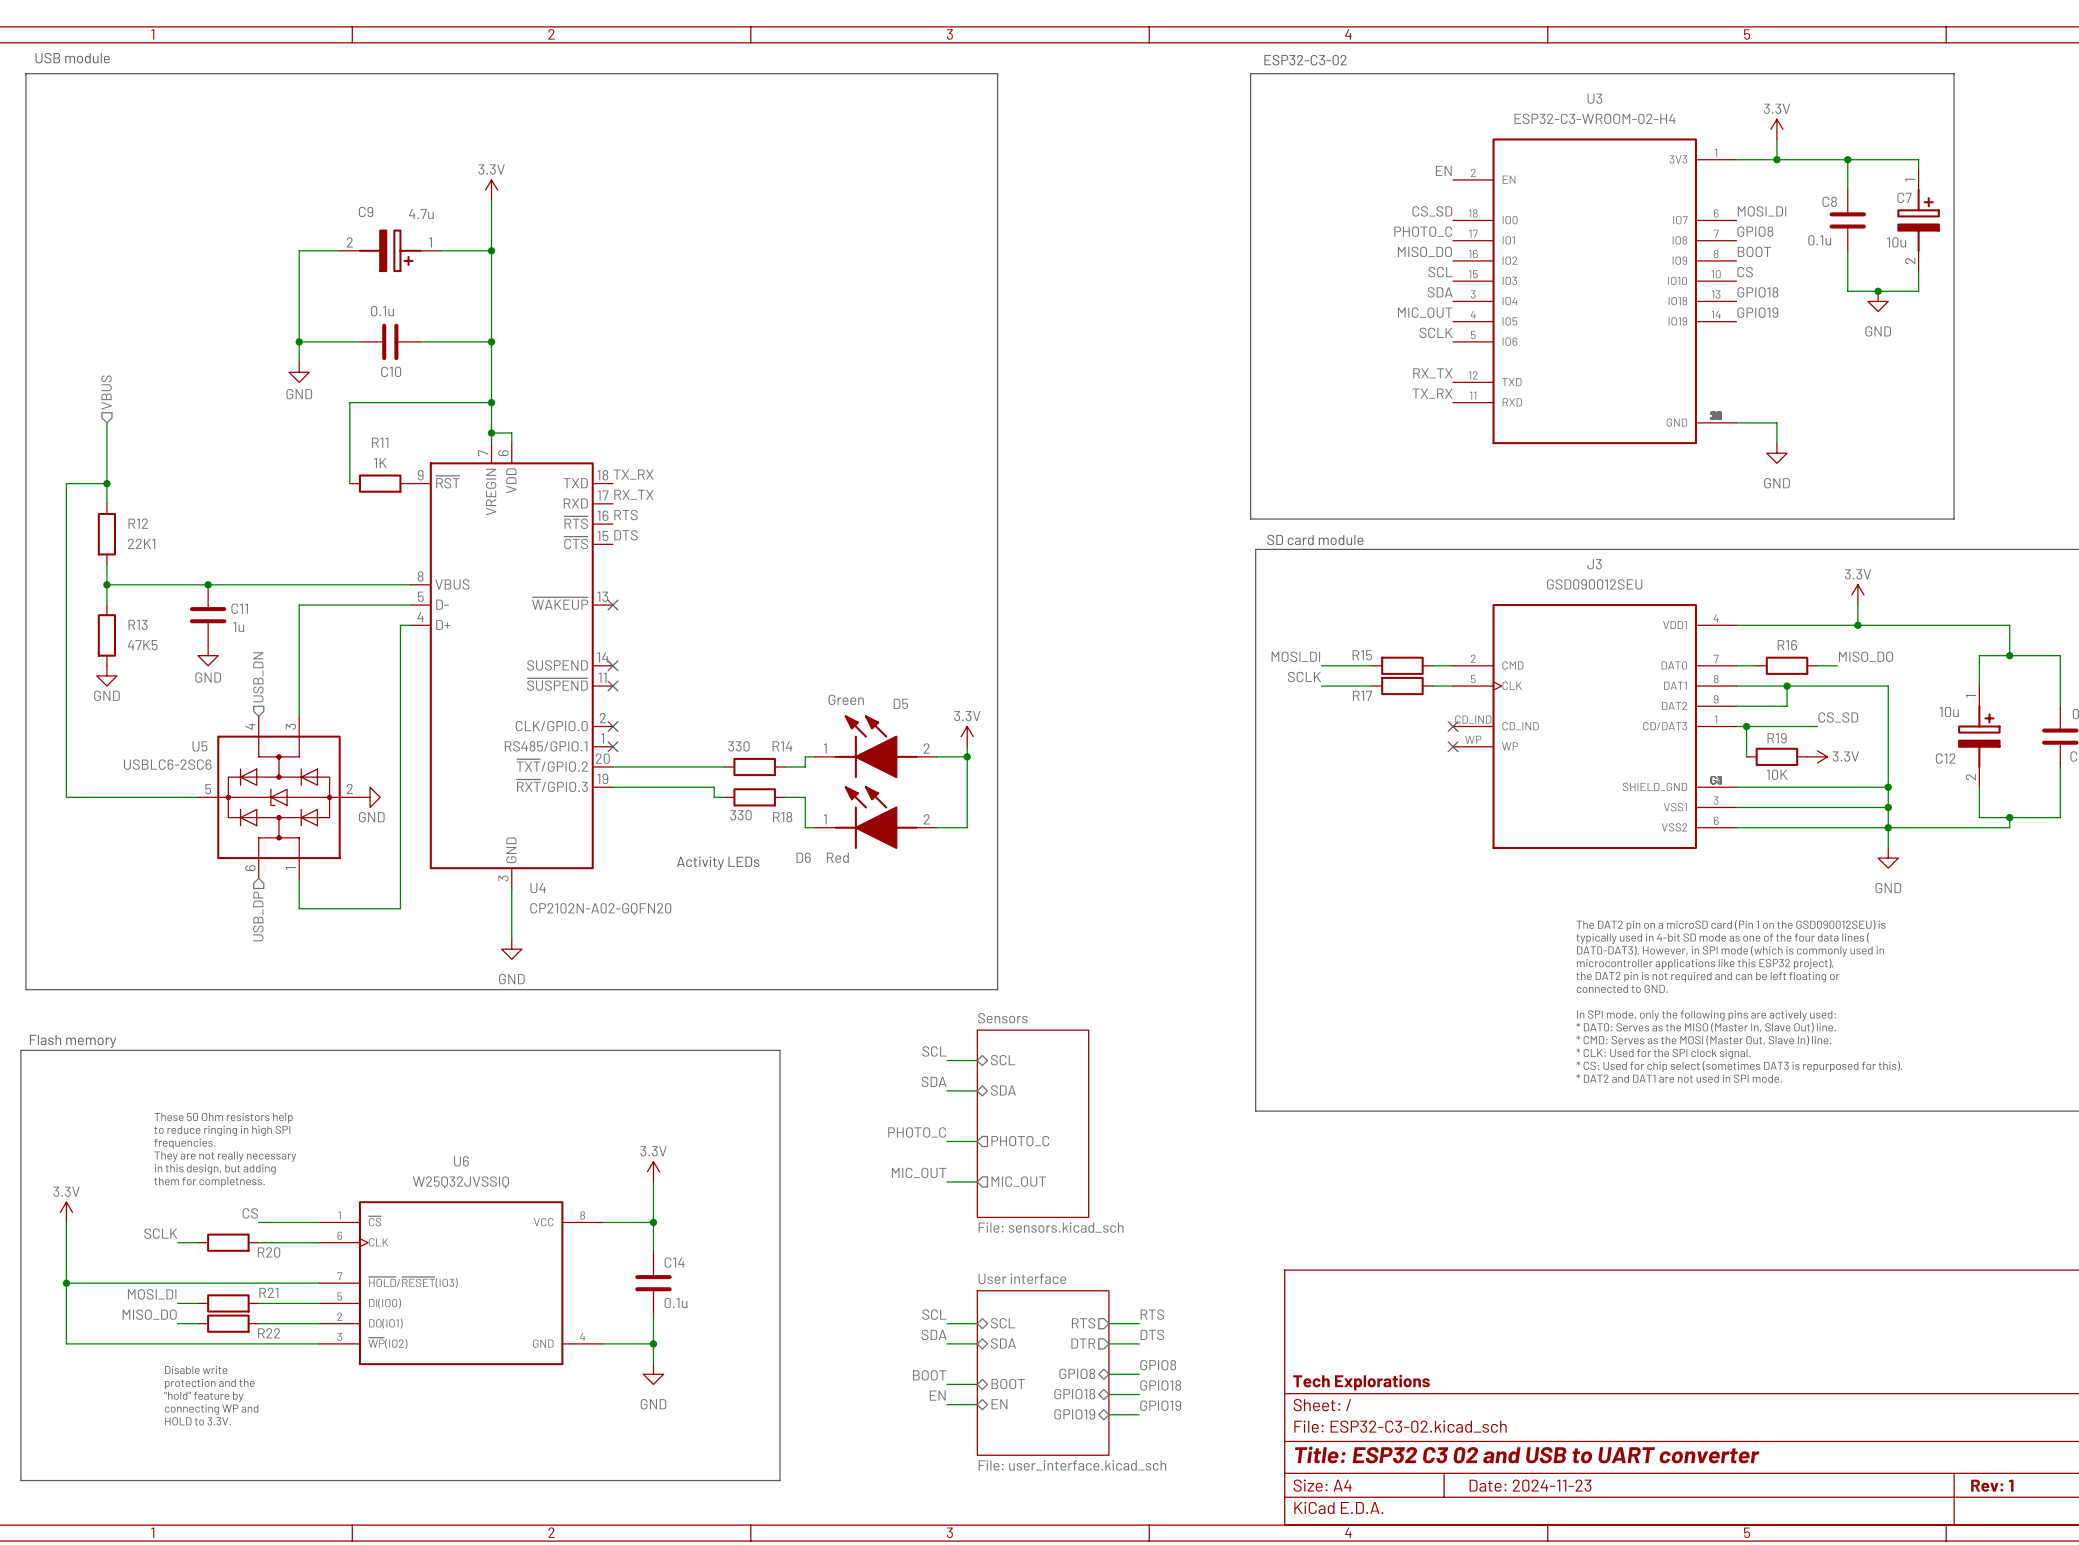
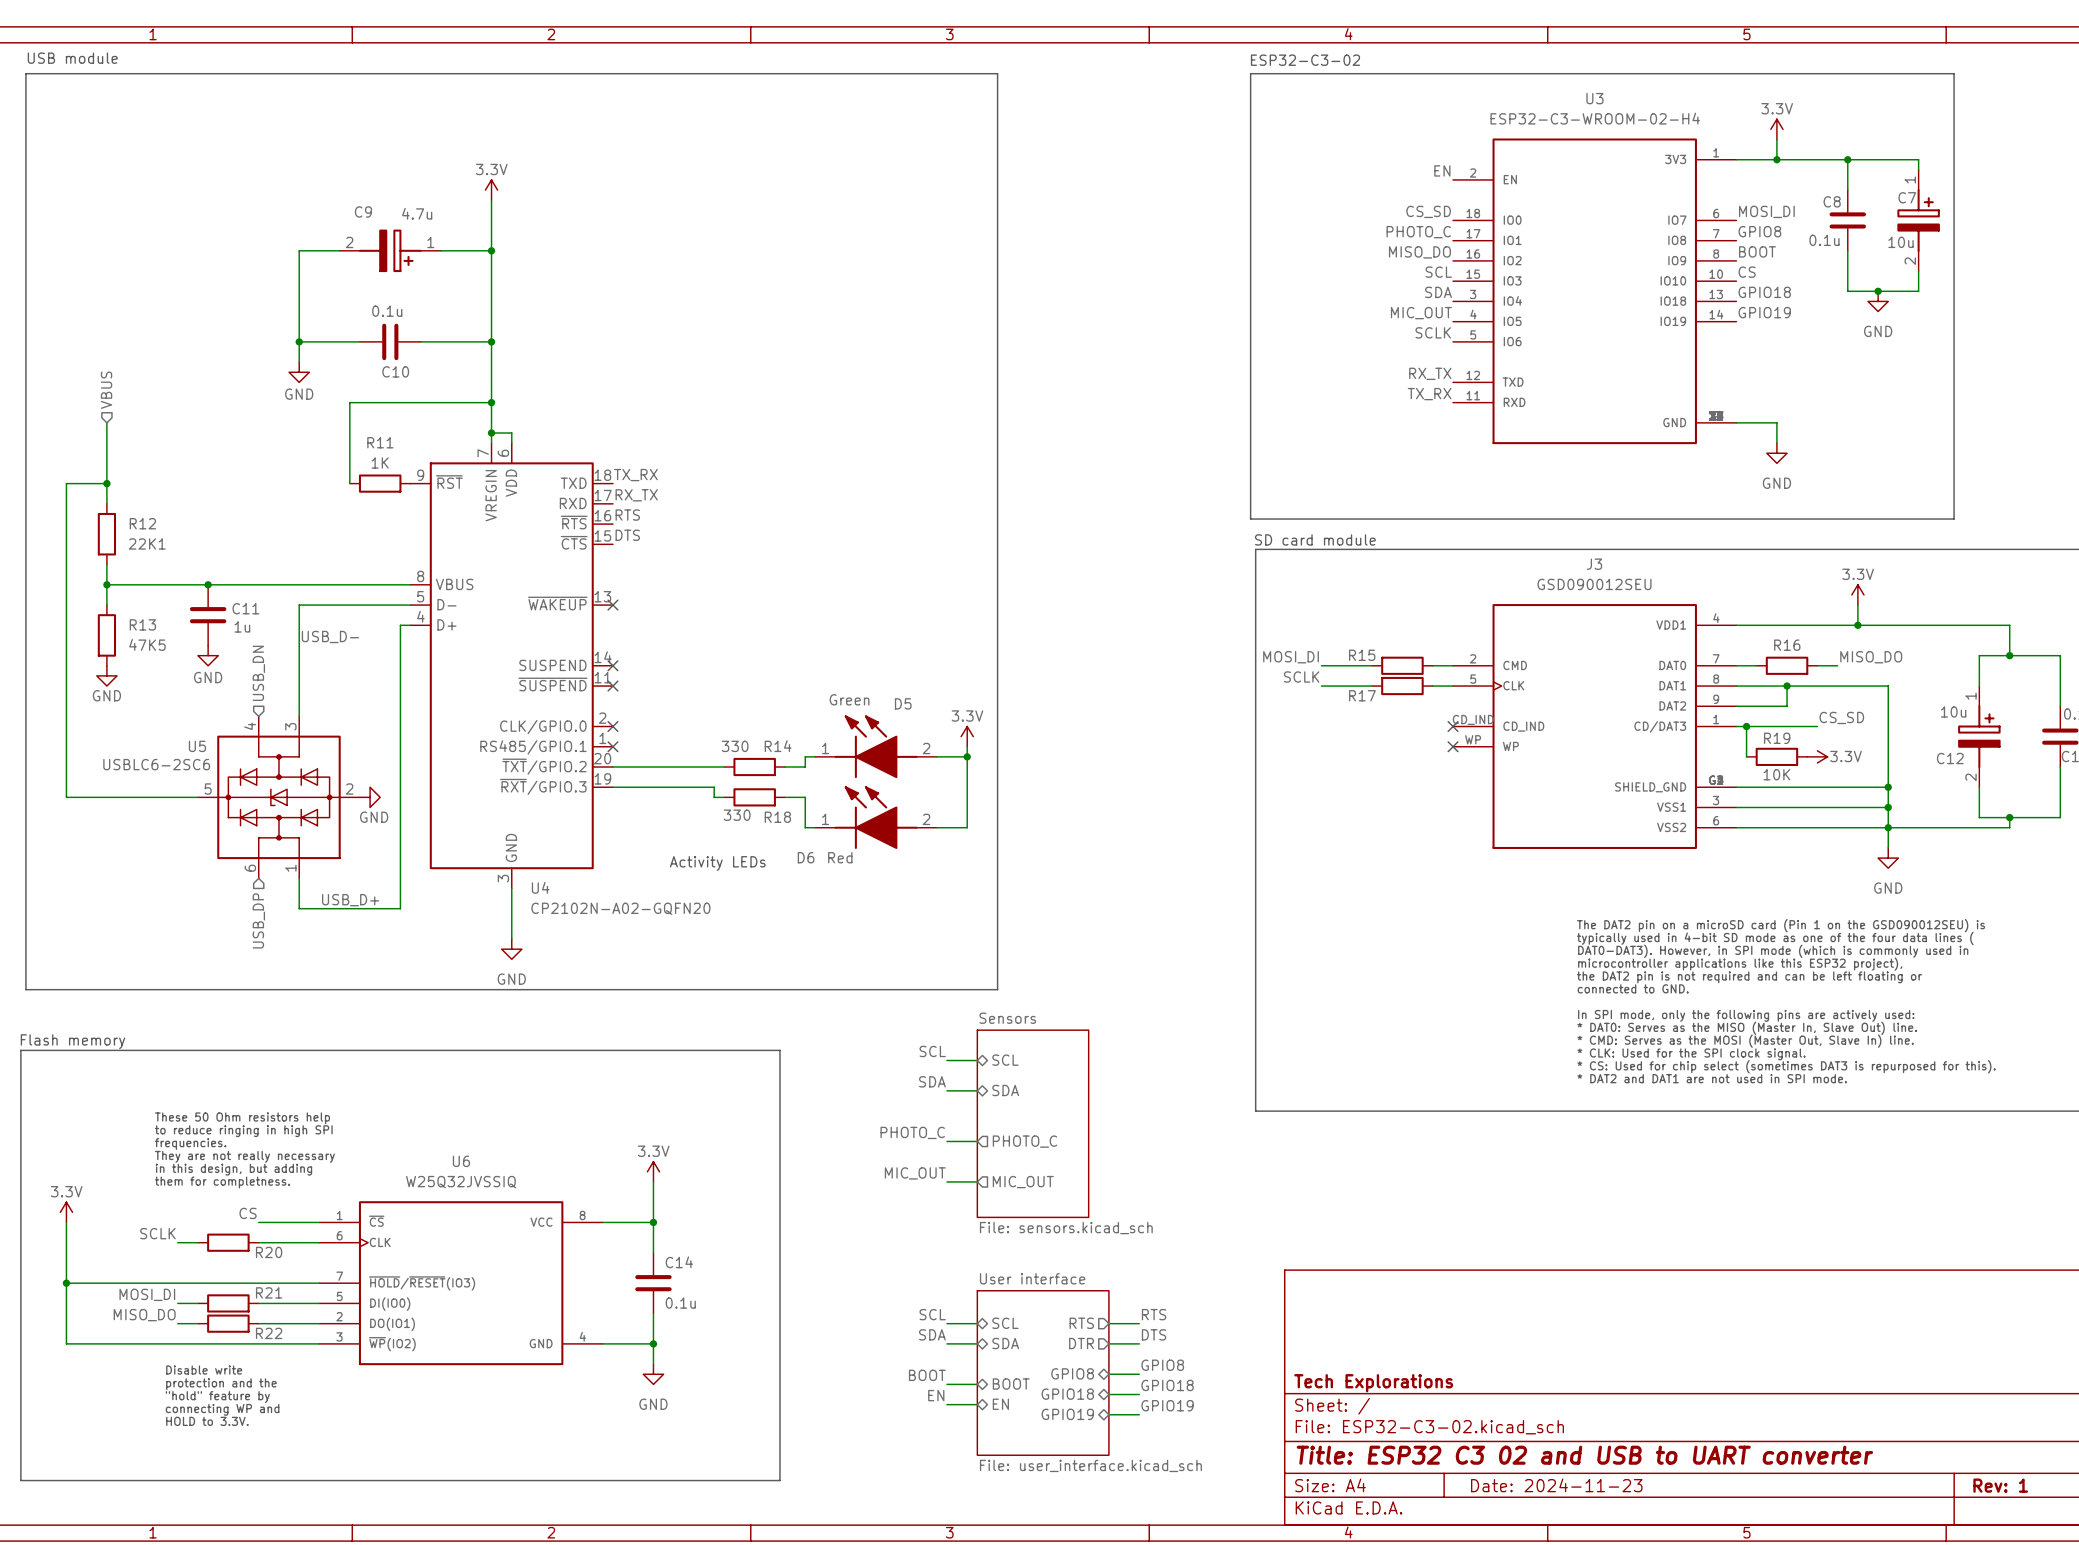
label: none -> USB_D- (330, 636)
label: none -> USB_D+ (350, 900)

